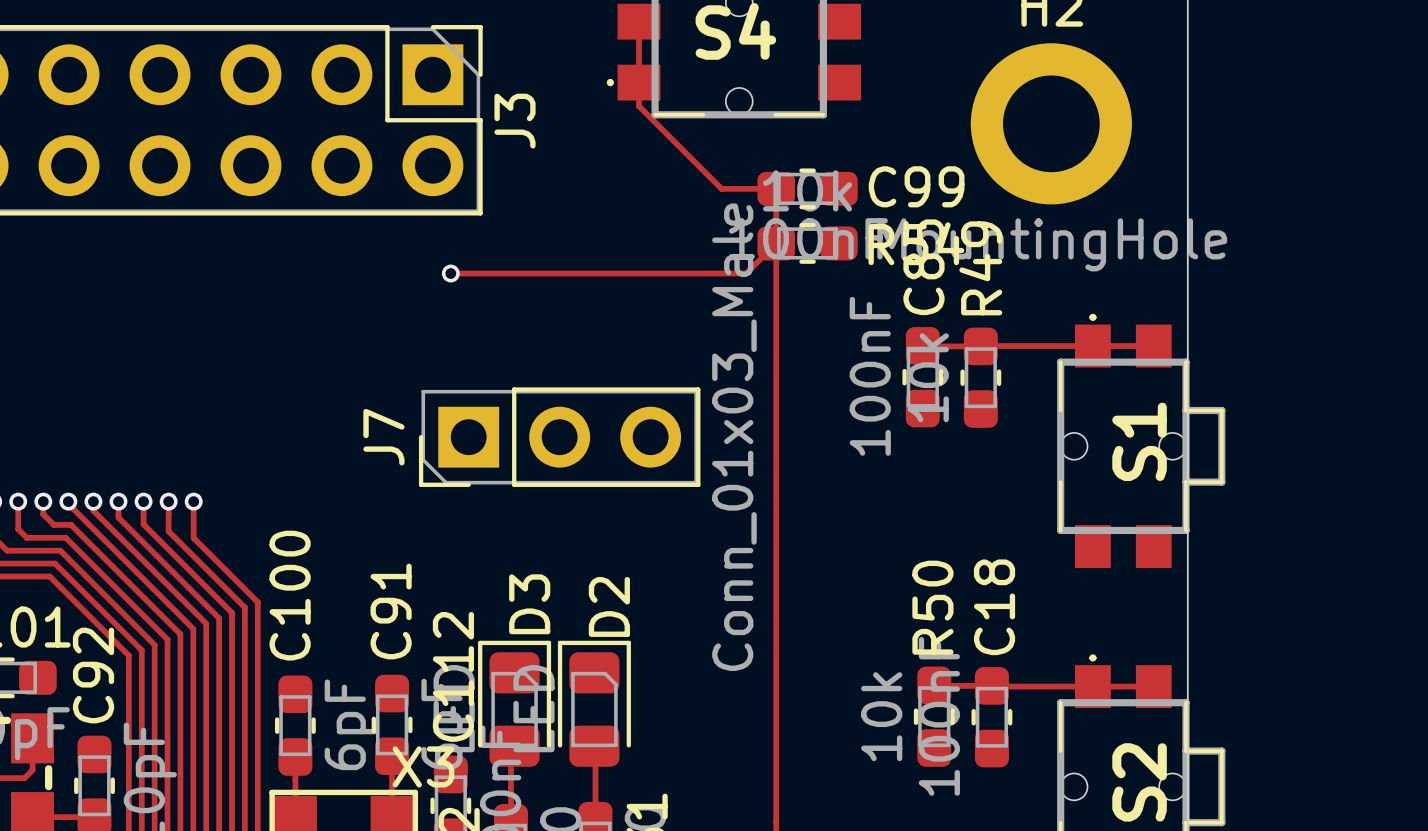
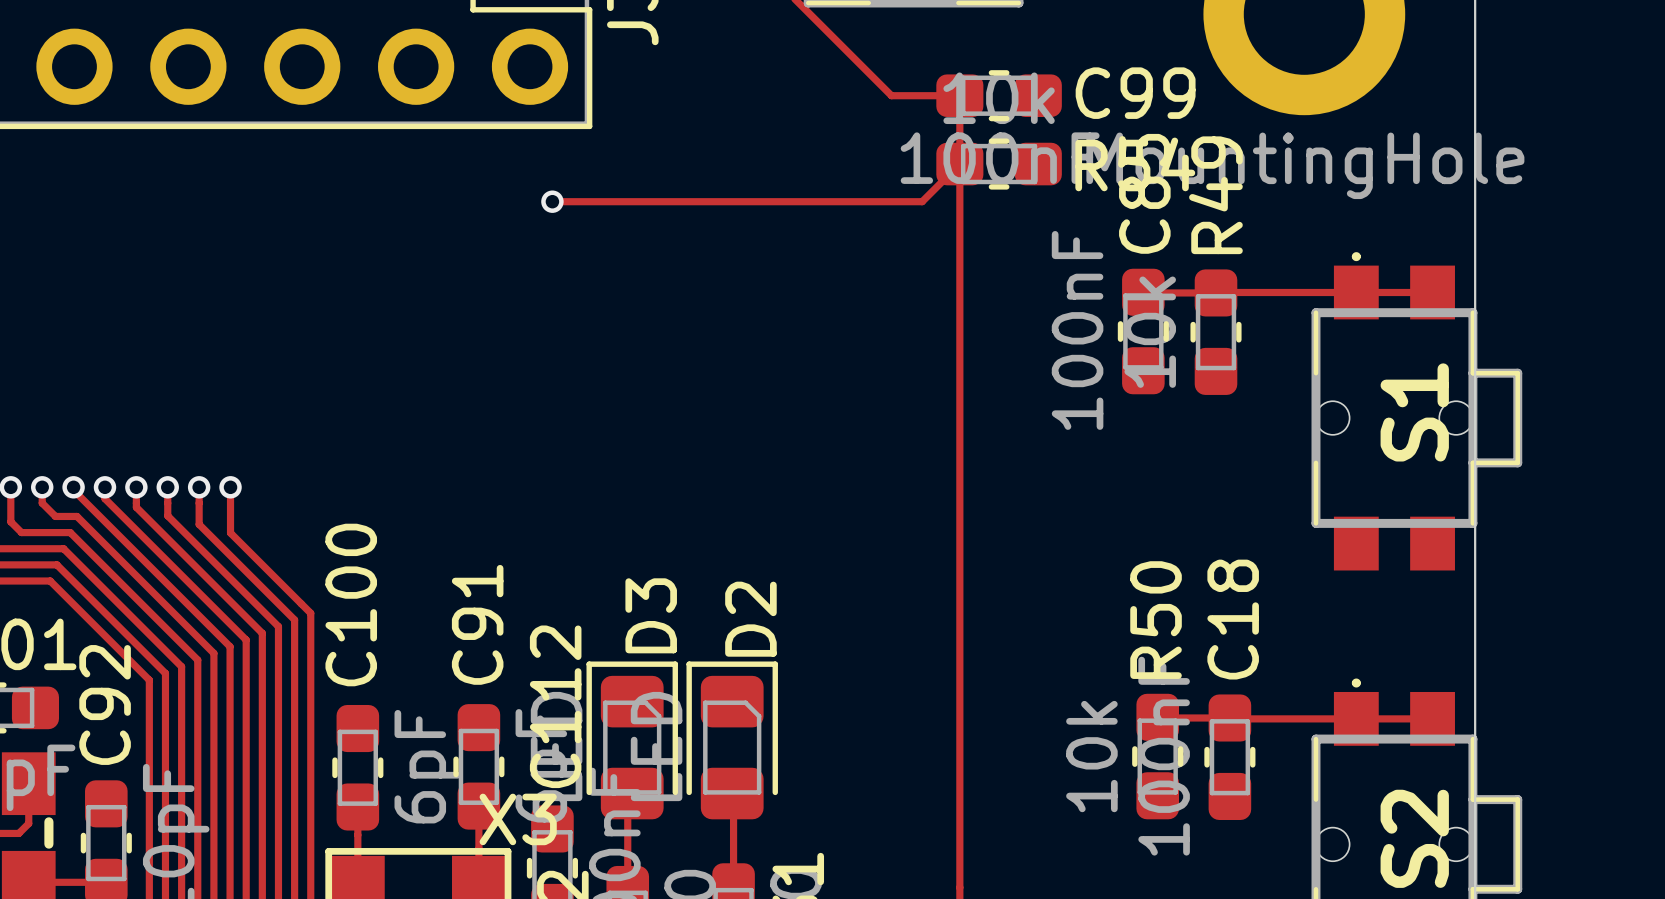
J7: Conn_01x03_Male (559, 437) -> none

